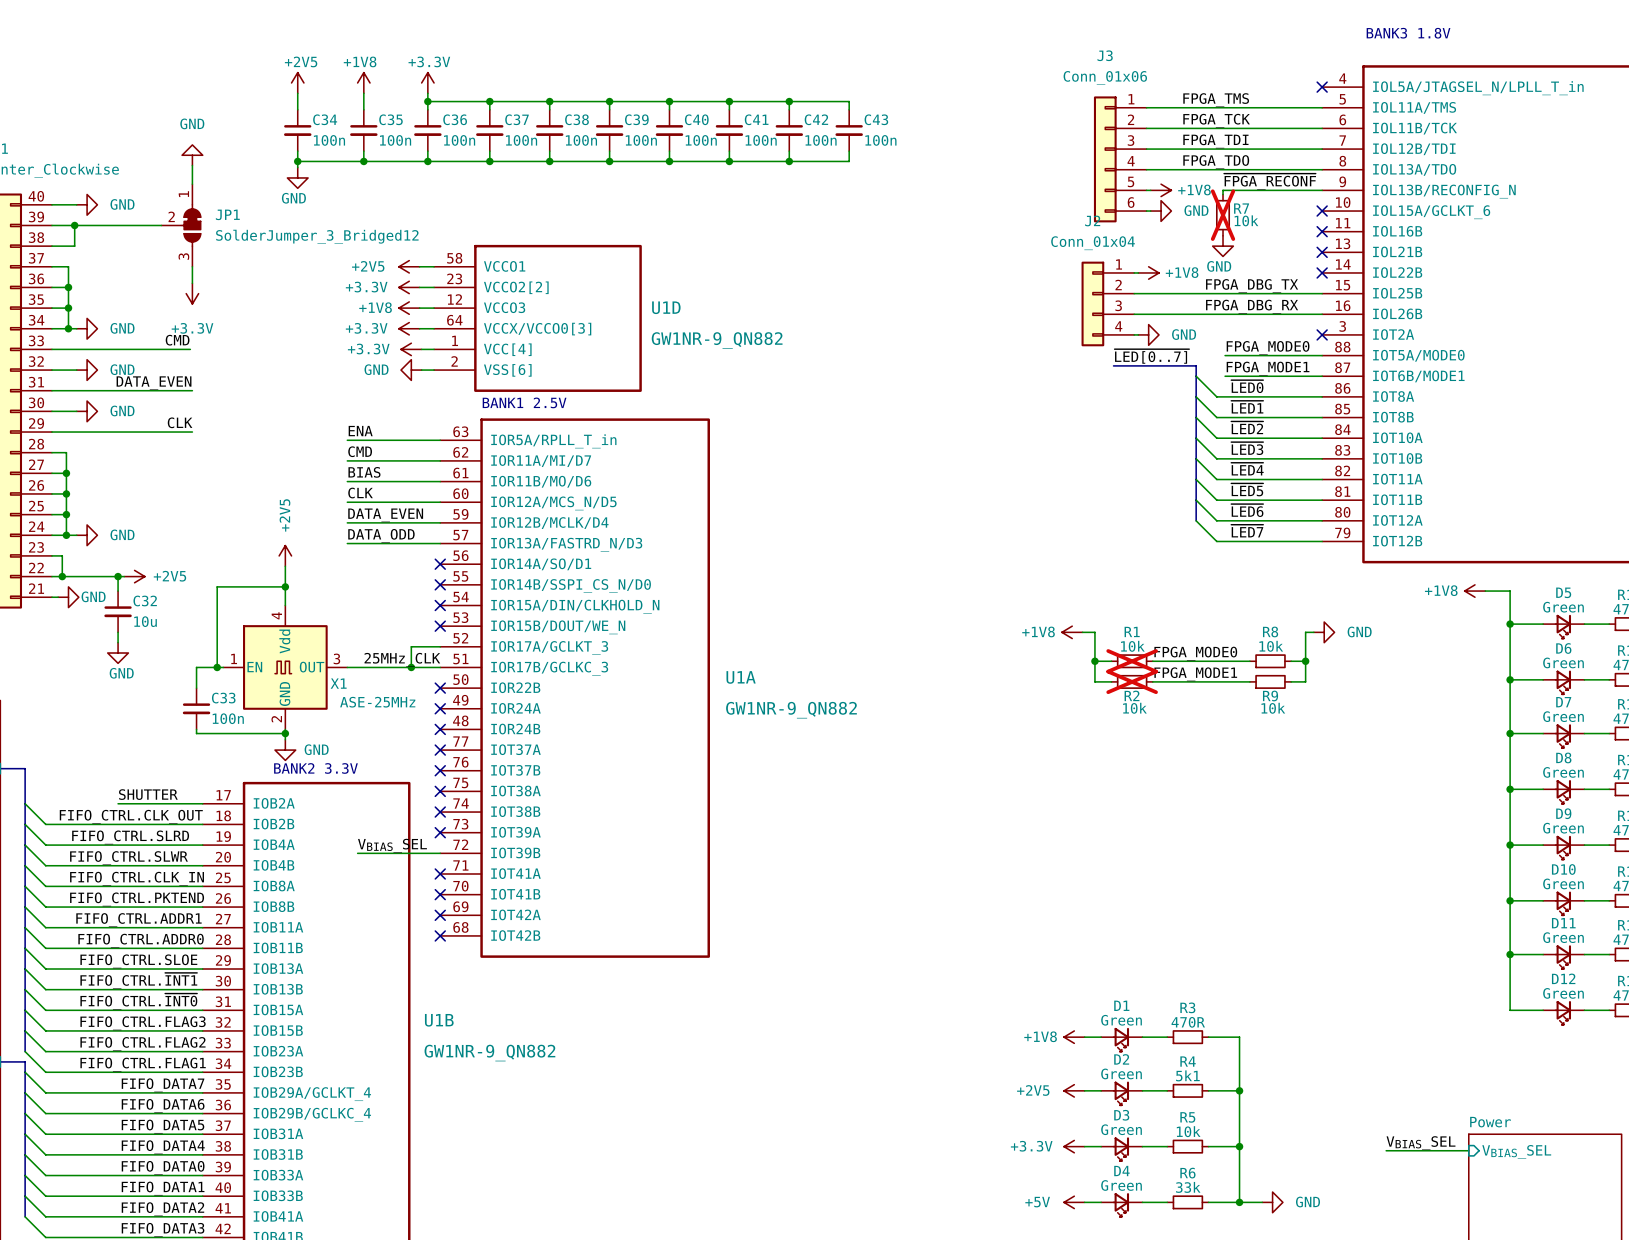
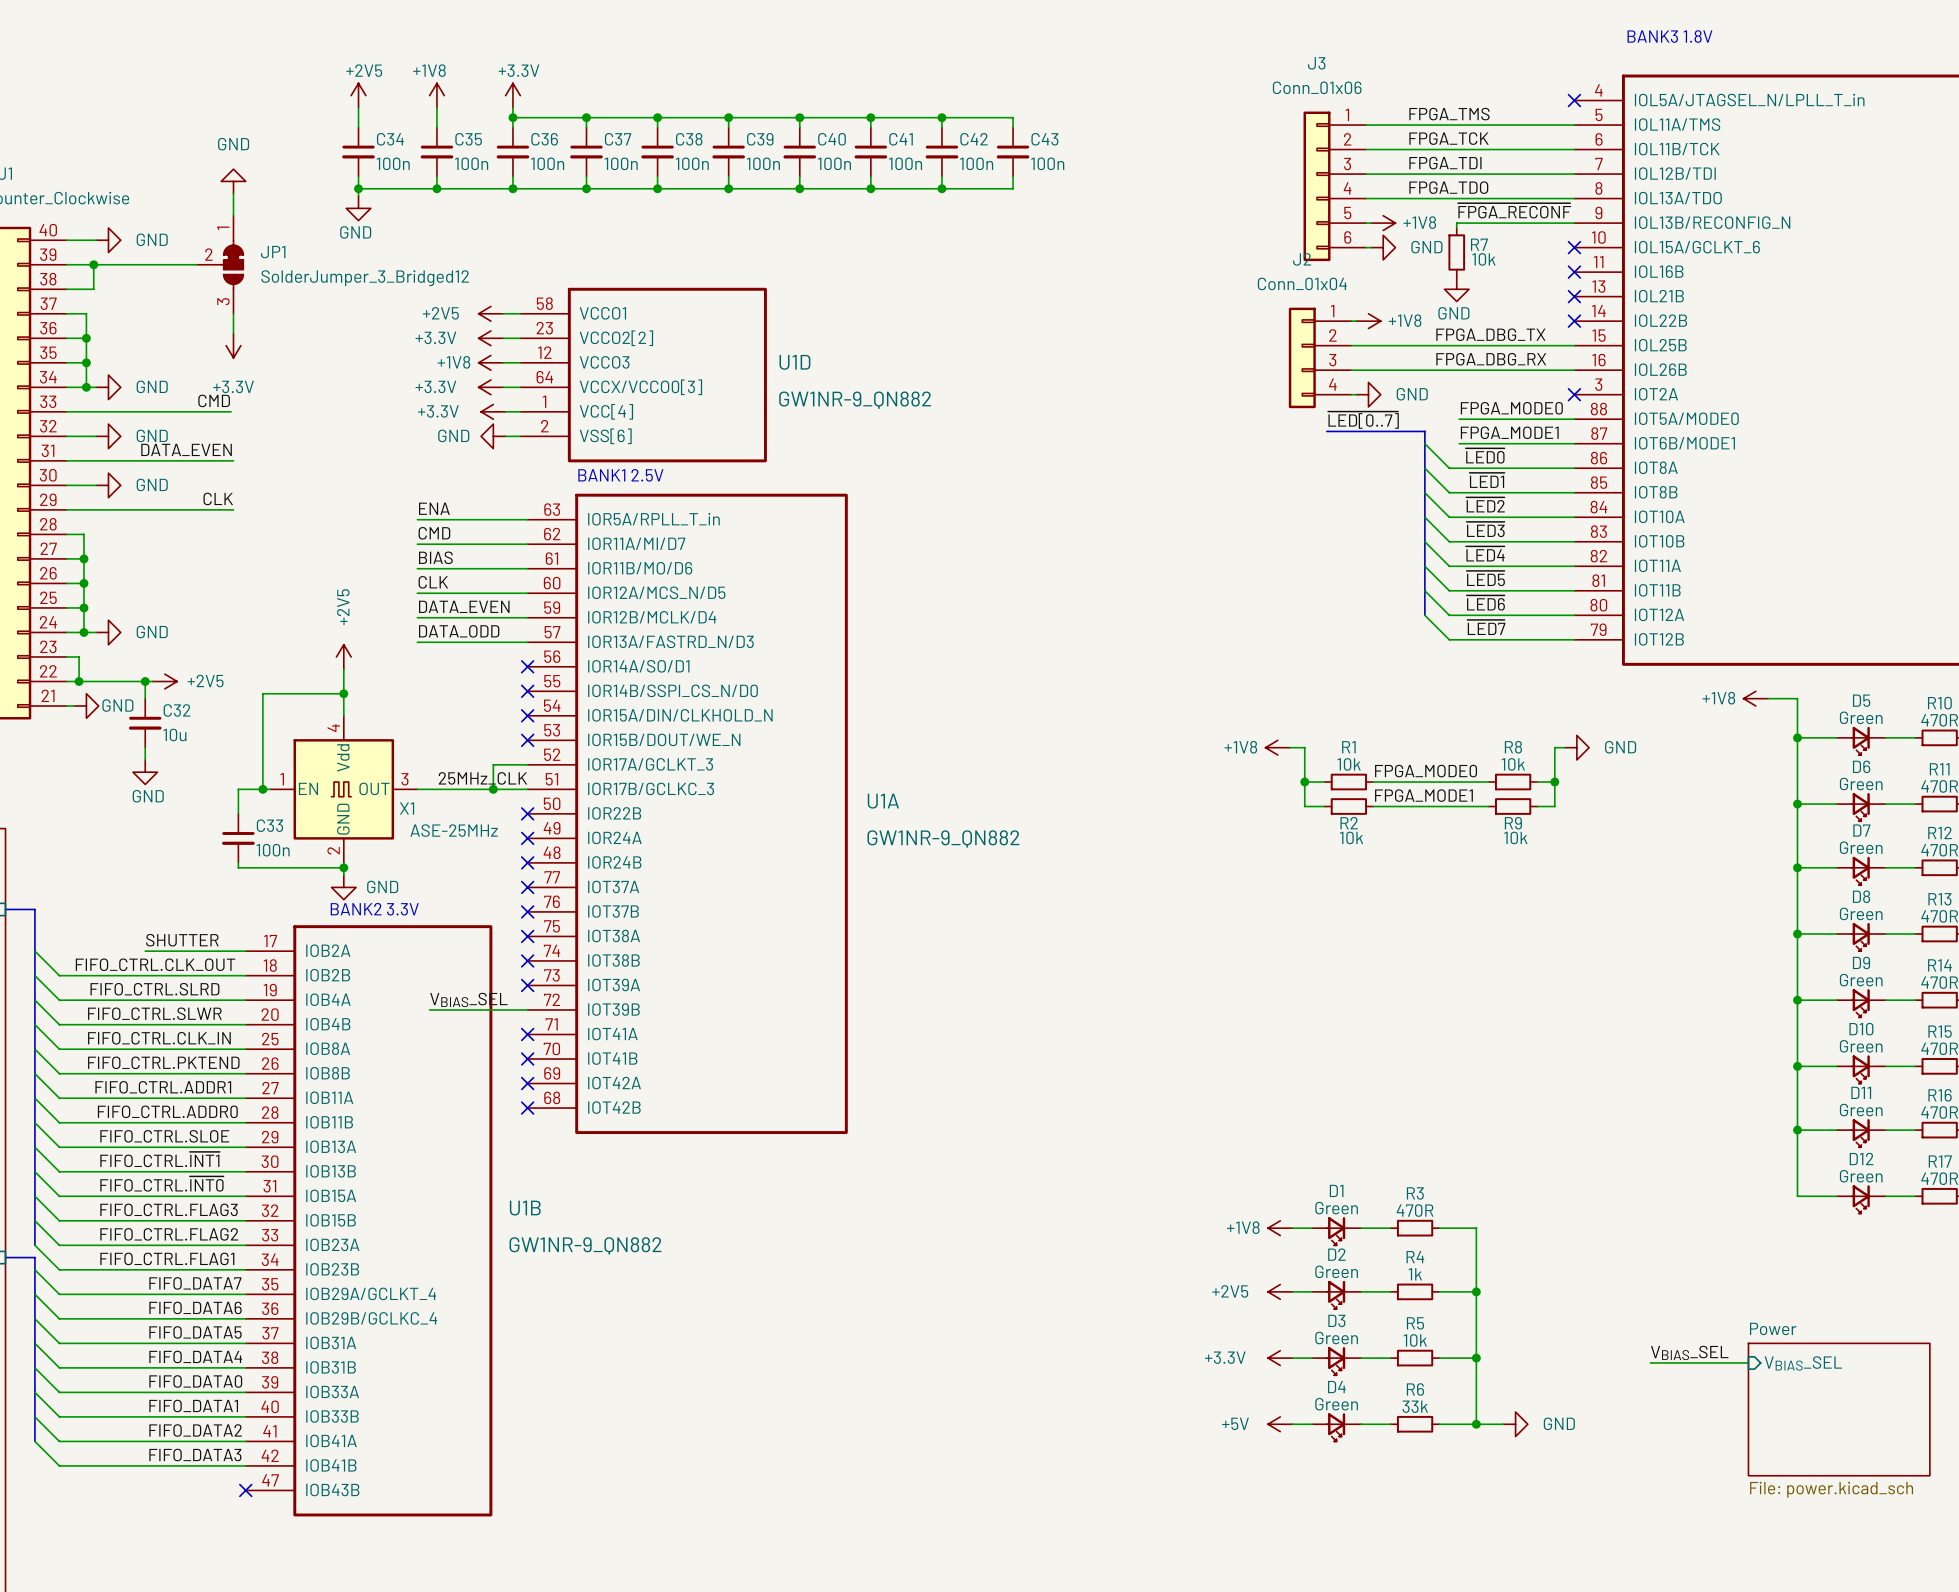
R7 do-not-place cross: (1223, 215) -> none
R1 do-not-place cross: (1132, 661) -> none
R2 do-not-place cross: (1132, 681) -> none
R4 value: 5k1 (1187, 1075) -> 1k (1415, 1274)

